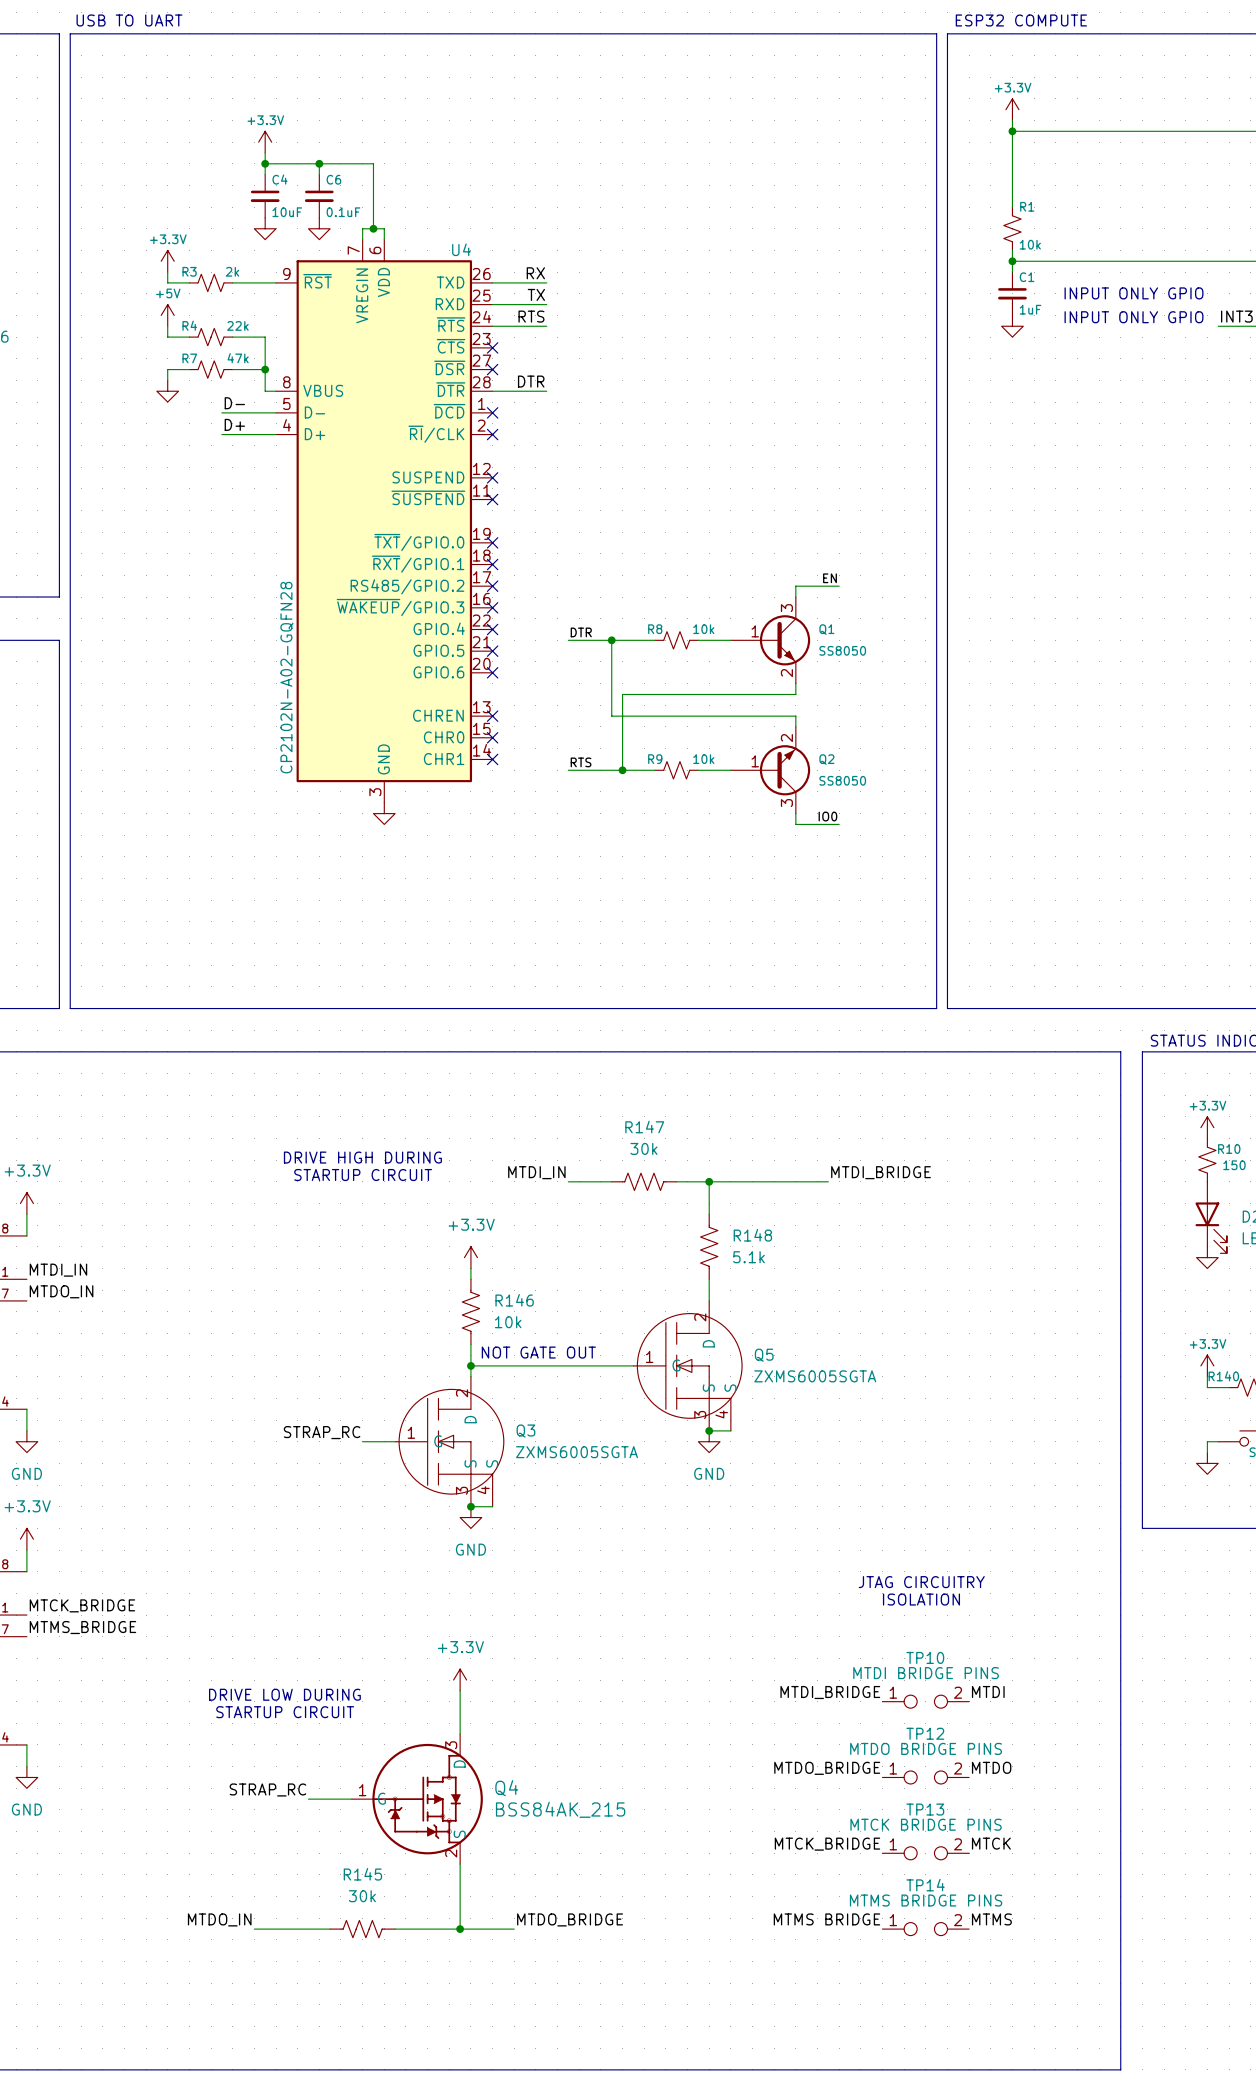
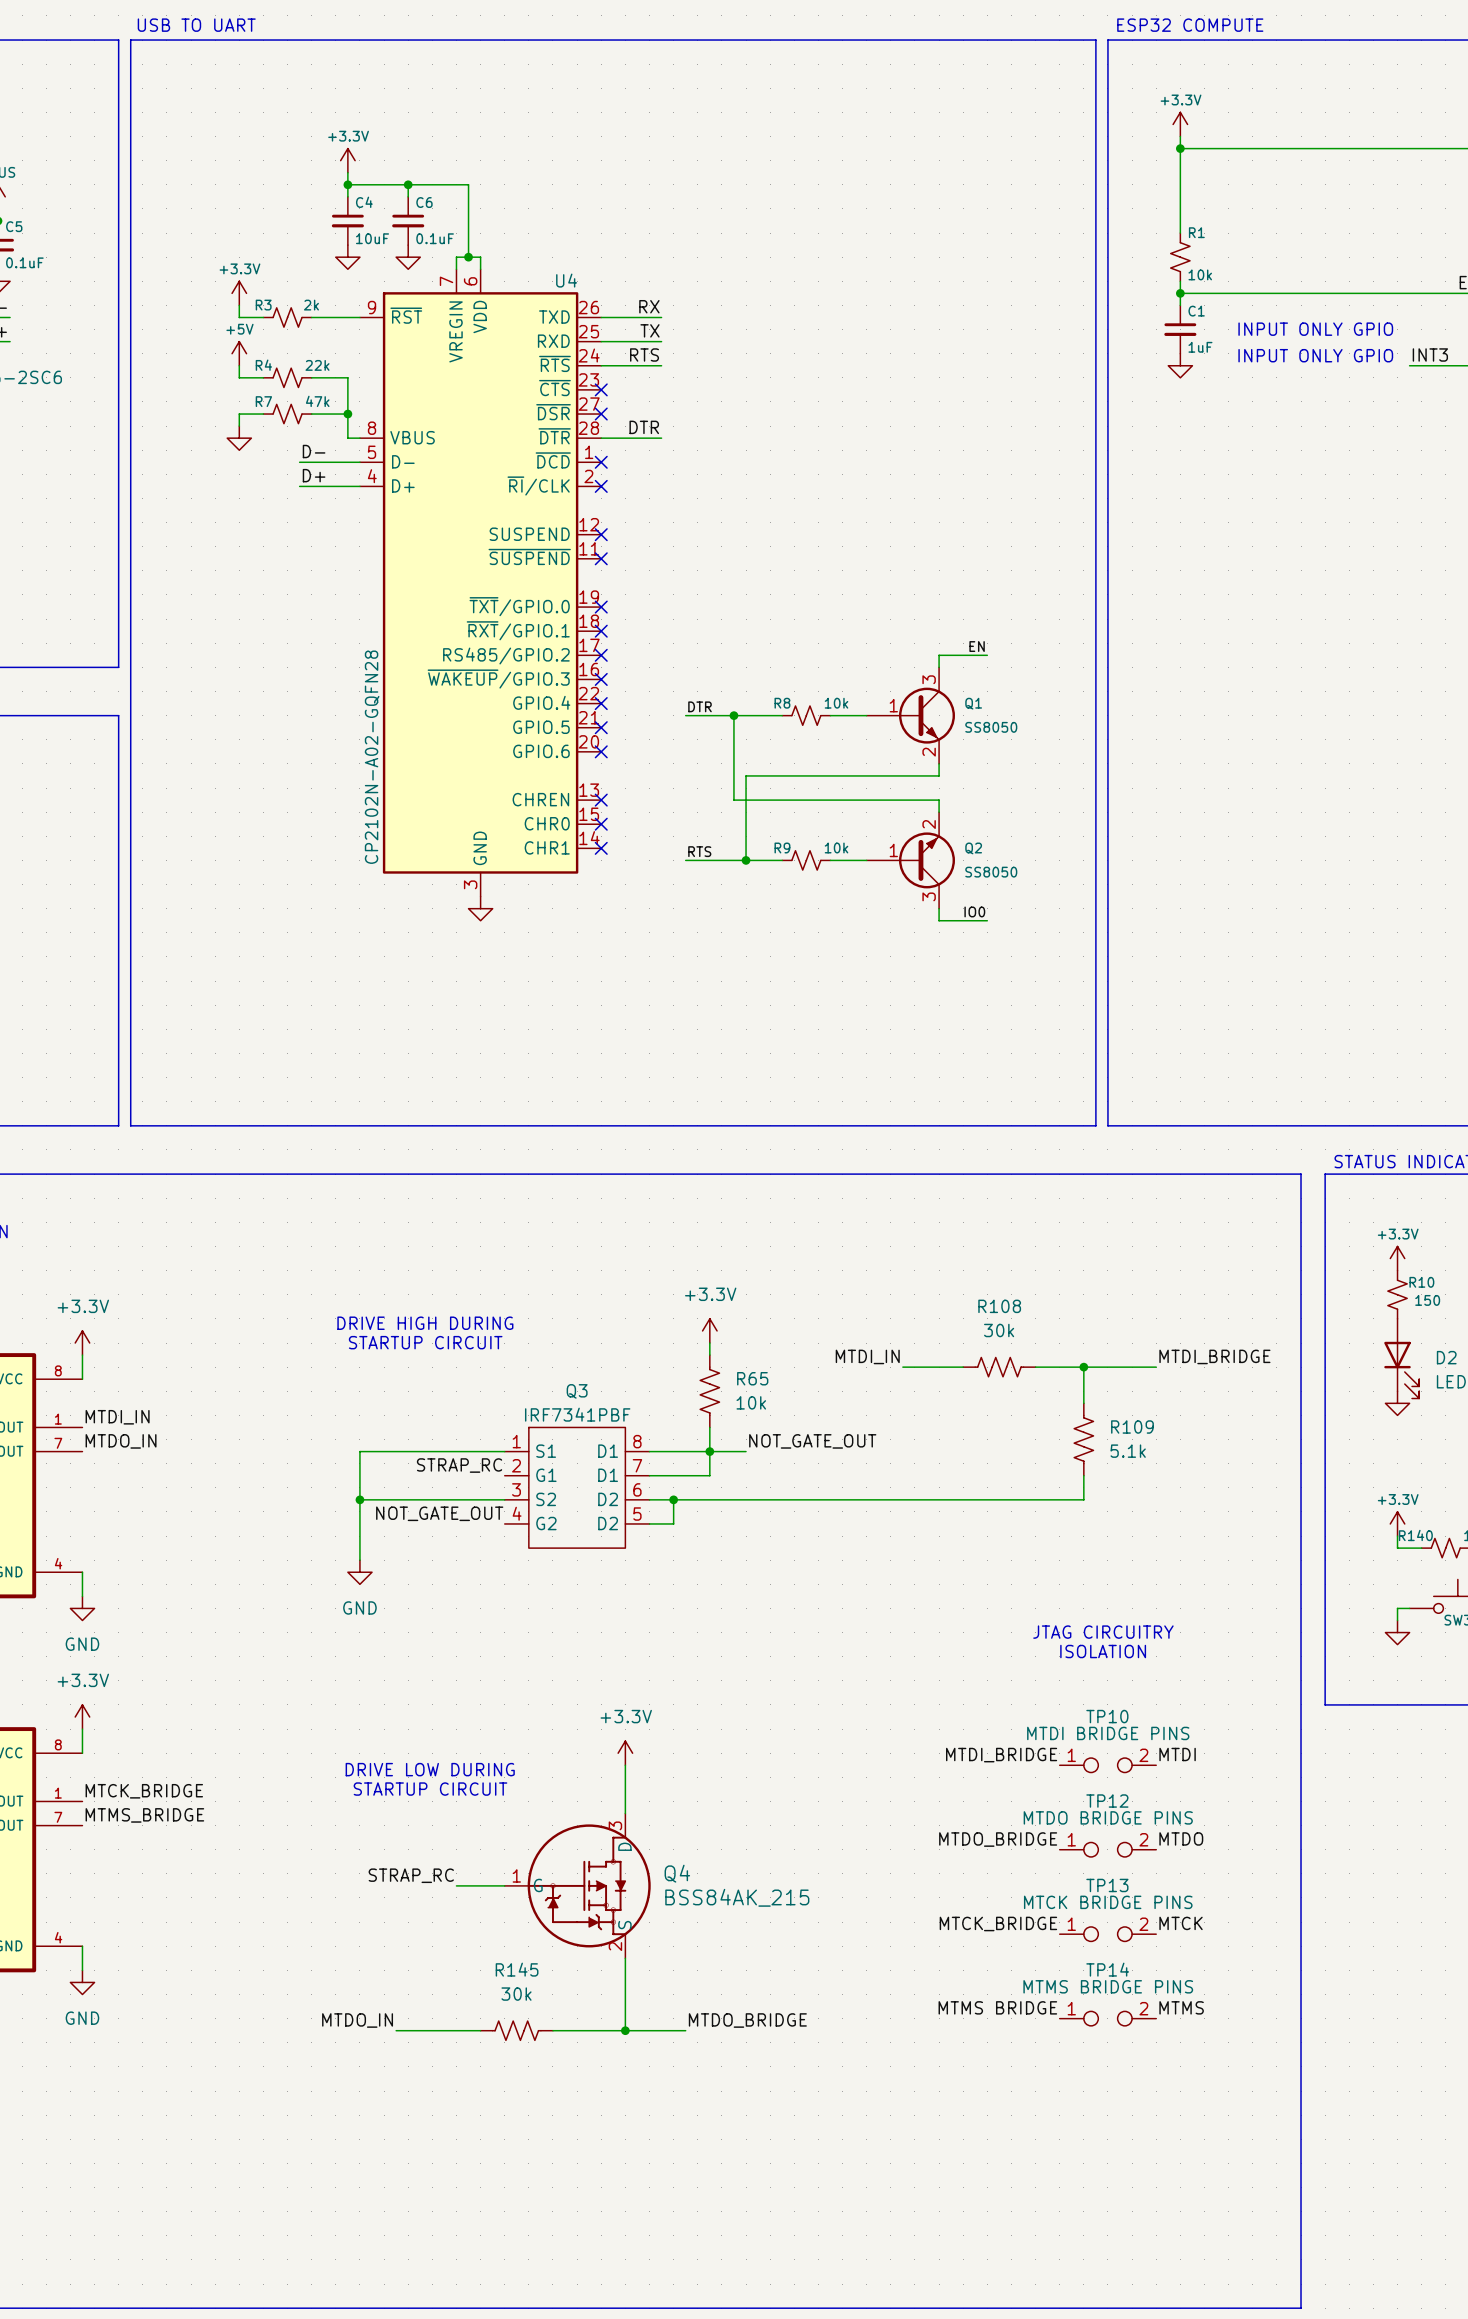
text position: DRIVE HIGH DURING (362, 1157) -> DRIVE HIGH DURING (425, 1323)
label position: MTDI_IN (536, 1172) -> MTDI_IN (867, 1356)
label position: MTDI_BRIDGE (881, 1172) -> MTDI_BRIDGE (1214, 1356)
text position: STARTUP CIRCUIT (363, 1175) -> STARTUP CIRCUIT (425, 1342)
wire: (568, 1181) (611, 1181) -> none
R147: 30k (644, 1181) -> none
wire: (676, 1181) (828, 1181) -> none
wire: (709, 1181) (709, 1214) -> none
junction: (709, 1181) -> none
wire: none -> (902, 1367) (963, 1367)
R108: none -> 30k (999, 1367)
wire: none -> (1035, 1367) (1156, 1367)
wire: none -> (1083, 1367) (1083, 1403)
junction: none -> (1083, 1367)
R65: none -> 10k (709, 1391)
R148: 5.1k (709, 1246) -> none
power symbol position: +3.3V (470, 1257) -> +3.3V (709, 1330)
wire: (470, 1268) (470, 1279) -> (709, 1343) (709, 1355)
wire: none -> (709, 1427) (709, 1475) (649, 1475)
wire: (709, 1279) (709, 1300) -> none
R109: none -> 5.1k (1083, 1439)
label: none -> NOT_GATE_OUT (812, 1441)
wire: none -> (504, 1451) (359, 1451) (359, 1560)
wire: none -> (649, 1451) (746, 1451)
junction: none -> (709, 1451)
R146: 10k (470, 1311) -> none
label: none -> STRAP_RC (459, 1465)
wire: none -> (1083, 1475) (1083, 1499) (649, 1499)
wire: none -> (359, 1499) (504, 1499)
junction: none -> (359, 1499)
wire: (470, 1344) (470, 1376) -> none
junction: none -> (673, 1499)
text: NOT GATE OUT (538, 1352) -> none
label: none -> NOT_GATE_OUT (439, 1513)
wire: (470, 1365) (535, 1365) -> none
junction: (470, 1365) -> none
wire: (557, 1365) (633, 1365) -> (673, 1523) (673, 1499)
Q5: ZXMS6005SGTA (687, 1365) -> none
Q3 symbol: [395, 1376, 504, 1507] -> [504, 1427, 650, 1549]
power symbol: none -> GND (359, 1572)
wire: (709, 1430) (730, 1430) -> none
junction: (709, 1430) -> none
Q3 name position: Q3 (525, 1431) -> Q3 (577, 1391)
label: STRAP_RC (322, 1432) -> none
wire: (362, 1441) (395, 1441) -> none
power symbol: GND (709, 1441) -> none
Q3 value: ZXMS6005SGTA (577, 1452) -> IRF7341PBF (577, 1414)
wire: (470, 1506) (492, 1506) -> none
junction: (470, 1506) -> none
power symbol: GND (470, 1517) -> none
text position: JTAG CIRCUITRY (921, 1582) -> JTAG CIRCUITRY (1103, 1632)
text position: ISOLATION (921, 1599) -> ISOLATION (1103, 1651)
power symbol position: +3.3V (460, 1680) -> +3.3V (625, 1753)
wire: (460, 1690) (460, 1734) -> (625, 1765) (625, 1813)
label position: MTDI_BRIDGE (830, 1692) -> MTDI_BRIDGE (1001, 1755)
label position: MTDI (988, 1692) -> MTDI (1177, 1754)
text position: DRIVE LOW DURING (284, 1694) -> DRIVE LOW DURING (430, 1769)
TP10 position: (925, 1701) -> (1107, 1765)
text position: STARTUP CIRCUIT (285, 1712) -> STARTUP CIRCUIT (430, 1789)
label position: MTDO (991, 1767) -> MTDO (1181, 1838)
label position: MTDO_BRIDGE (827, 1768) -> MTDO_BRIDGE (998, 1839)
TP12 position: (925, 1777) -> (1107, 1849)
label position: STRAP_RC (267, 1789) -> STRAP_RC (411, 1875)
wire: (308, 1799) (351, 1799) -> (456, 1885) (504, 1885)
Q4 position: (417, 1799) -> (577, 1885)
junction: none -> (625, 2030)
label position: MTCK (991, 1843) -> MTCK (1181, 1923)
label position: MTCK_BRIDGE (827, 1844) -> MTCK_BRIDGE (998, 1923)
TP13 position: (925, 1853) -> (1107, 1934)
wire: (460, 1864) (460, 1929) -> (625, 1958) (625, 2030)
label position: MTDO_IN (219, 1919) -> MTDO_IN (357, 2020)
label position: MTDO_BRIDGE (570, 1919) -> MTDO_BRIDGE (747, 2020)
label position: MTMS BRIDGE (826, 1919) -> MTMS BRIDGE (997, 2007)
label position: MTMS (991, 1919) -> MTMS (1181, 2007)
wire: (254, 1929) (330, 1929) -> (396, 2030) (480, 2030)
R145 position: (362, 1929) -> (516, 2030)
wire: (395, 1929) (514, 1929) -> (552, 2030) (685, 2030)
junction: (460, 1929) -> none
TP14 position: (925, 1929) -> (1107, 2018)

